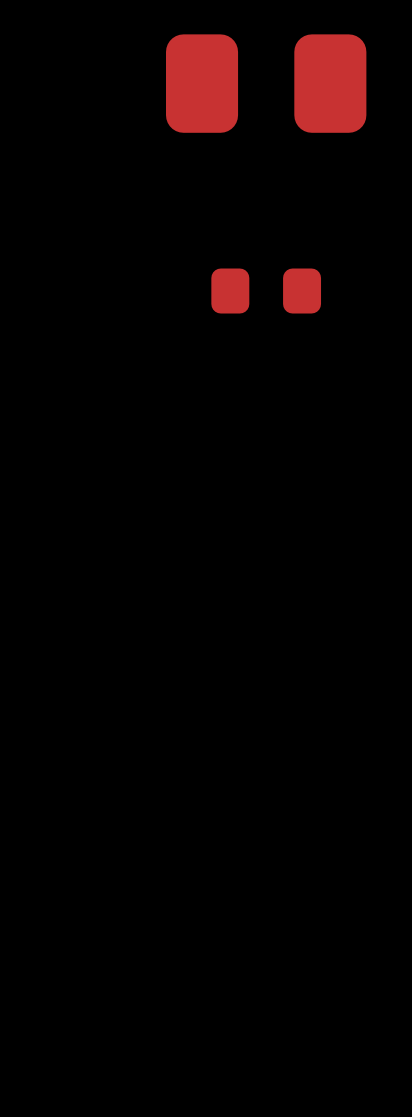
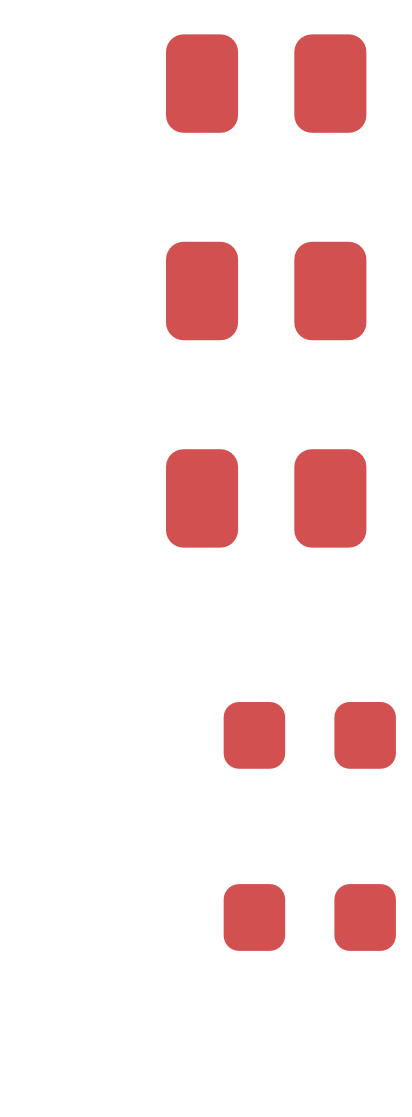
part footprint: [211, 268, 322, 314] -> [165, 241, 367, 341]
part: none -> (266, 498)
part: none -> (309, 735)
part: none -> (309, 917)

